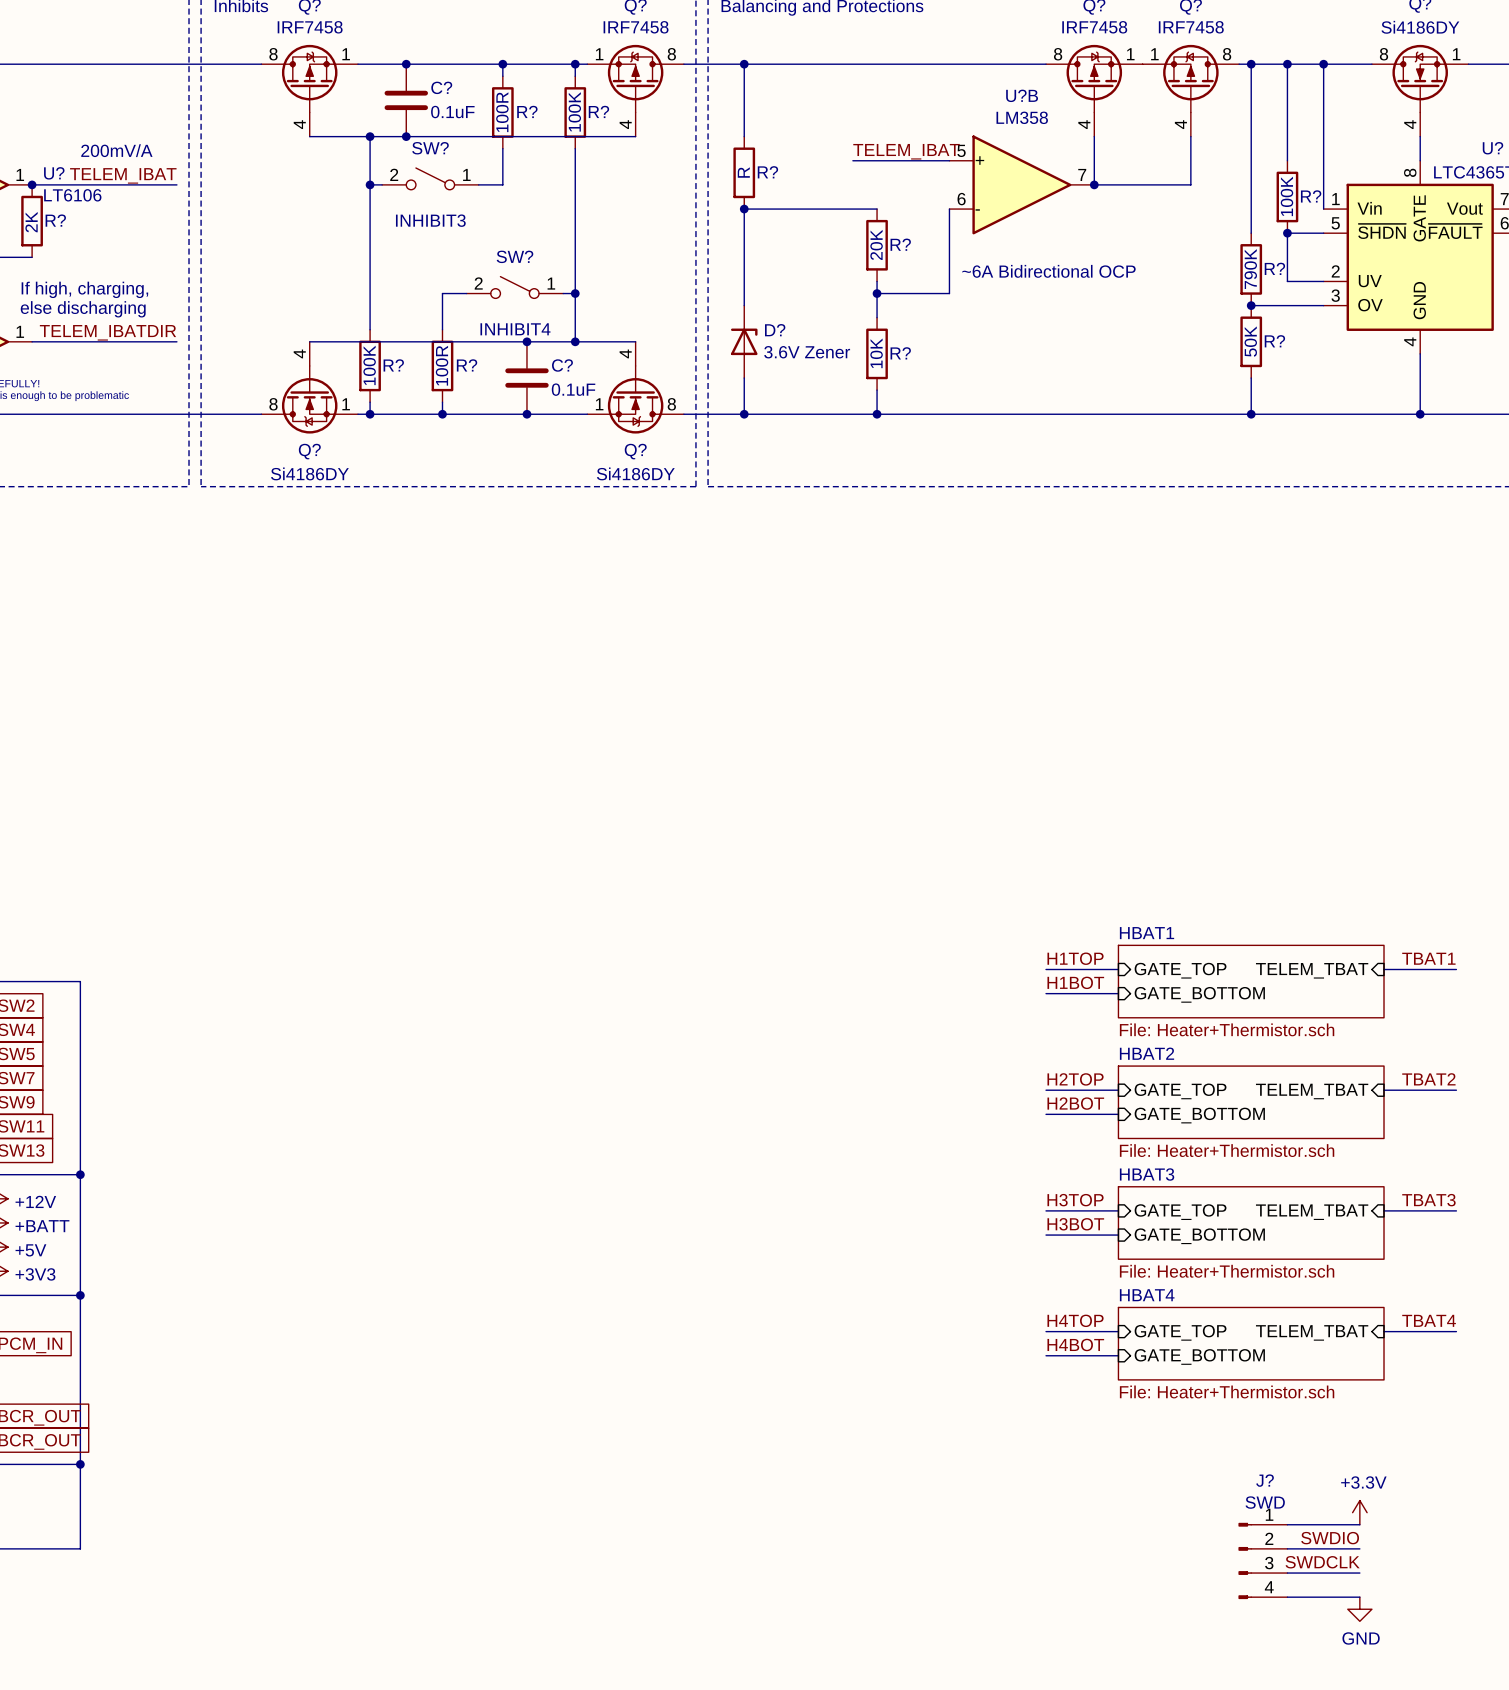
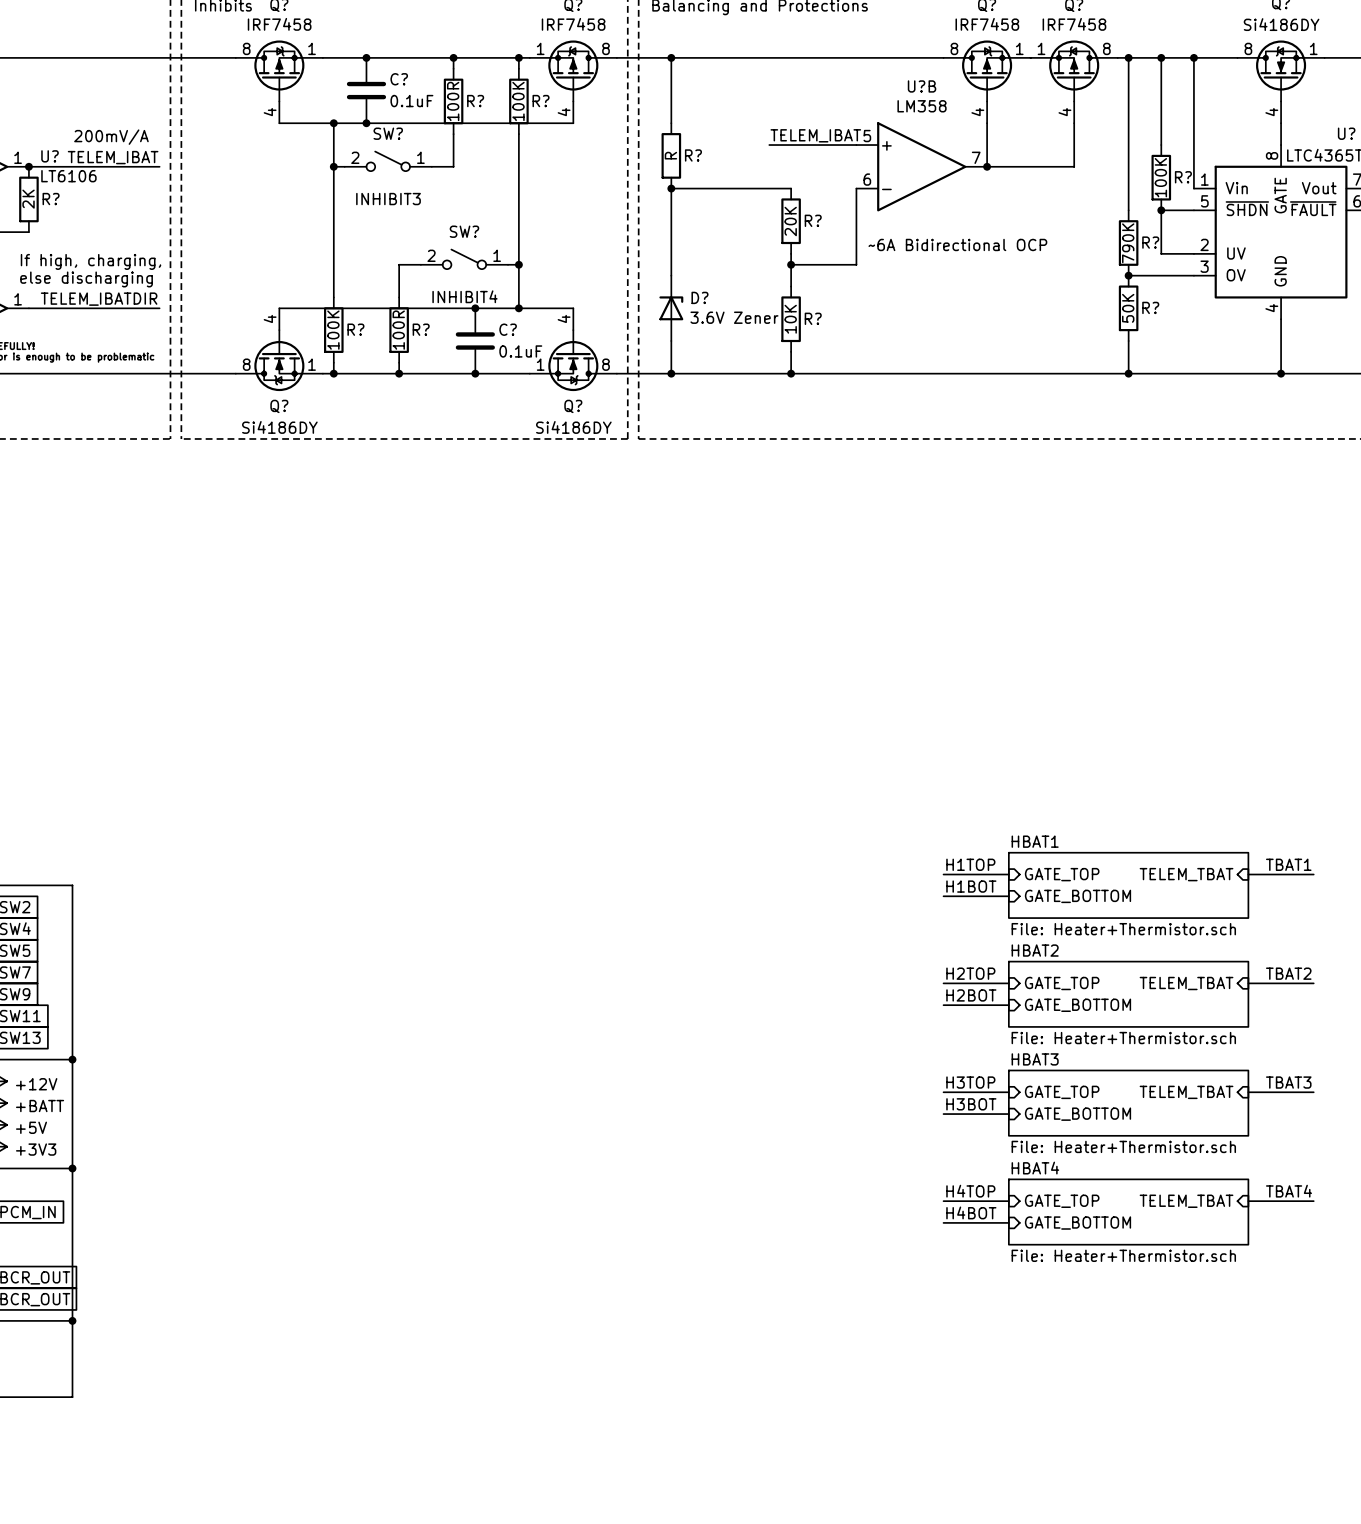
power symbol: +3.3V (1359, 1512) -> none
wire: (1287, 1524) (1359, 1524) -> none
label: SWDIO (1330, 1538) -> none
wire: (1287, 1548) (1359, 1548) -> none
J?: SWD (1262, 1560) -> none
label: SWDCLK (1322, 1562) -> none
wire: (1287, 1573) (1359, 1573) -> none
wire: (1287, 1597) (1359, 1597) -> none
power symbol: GND (1359, 1609) -> none

